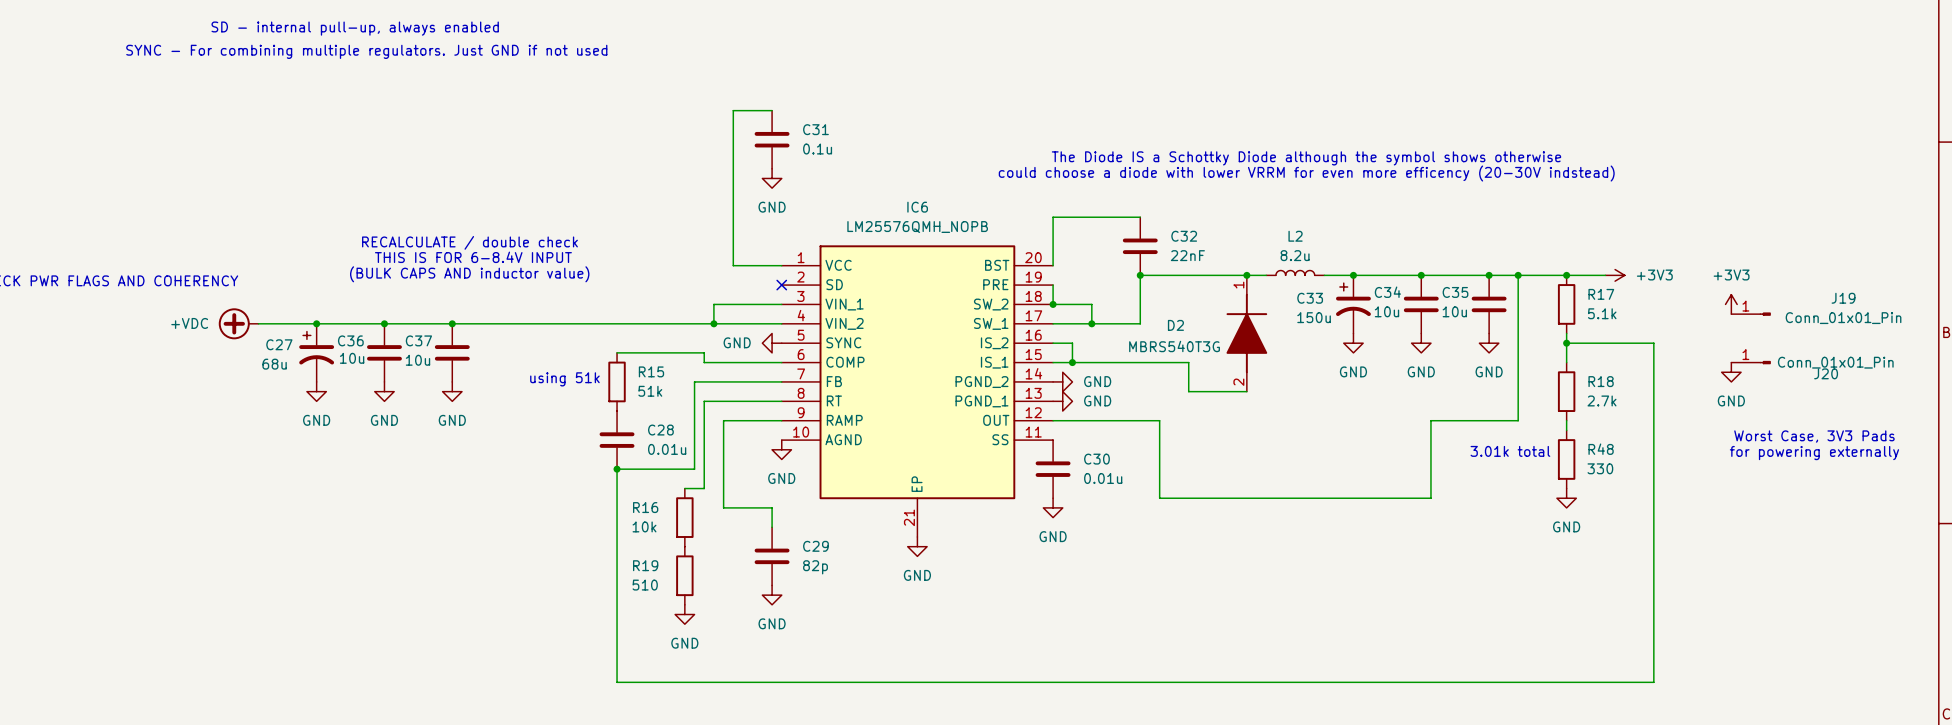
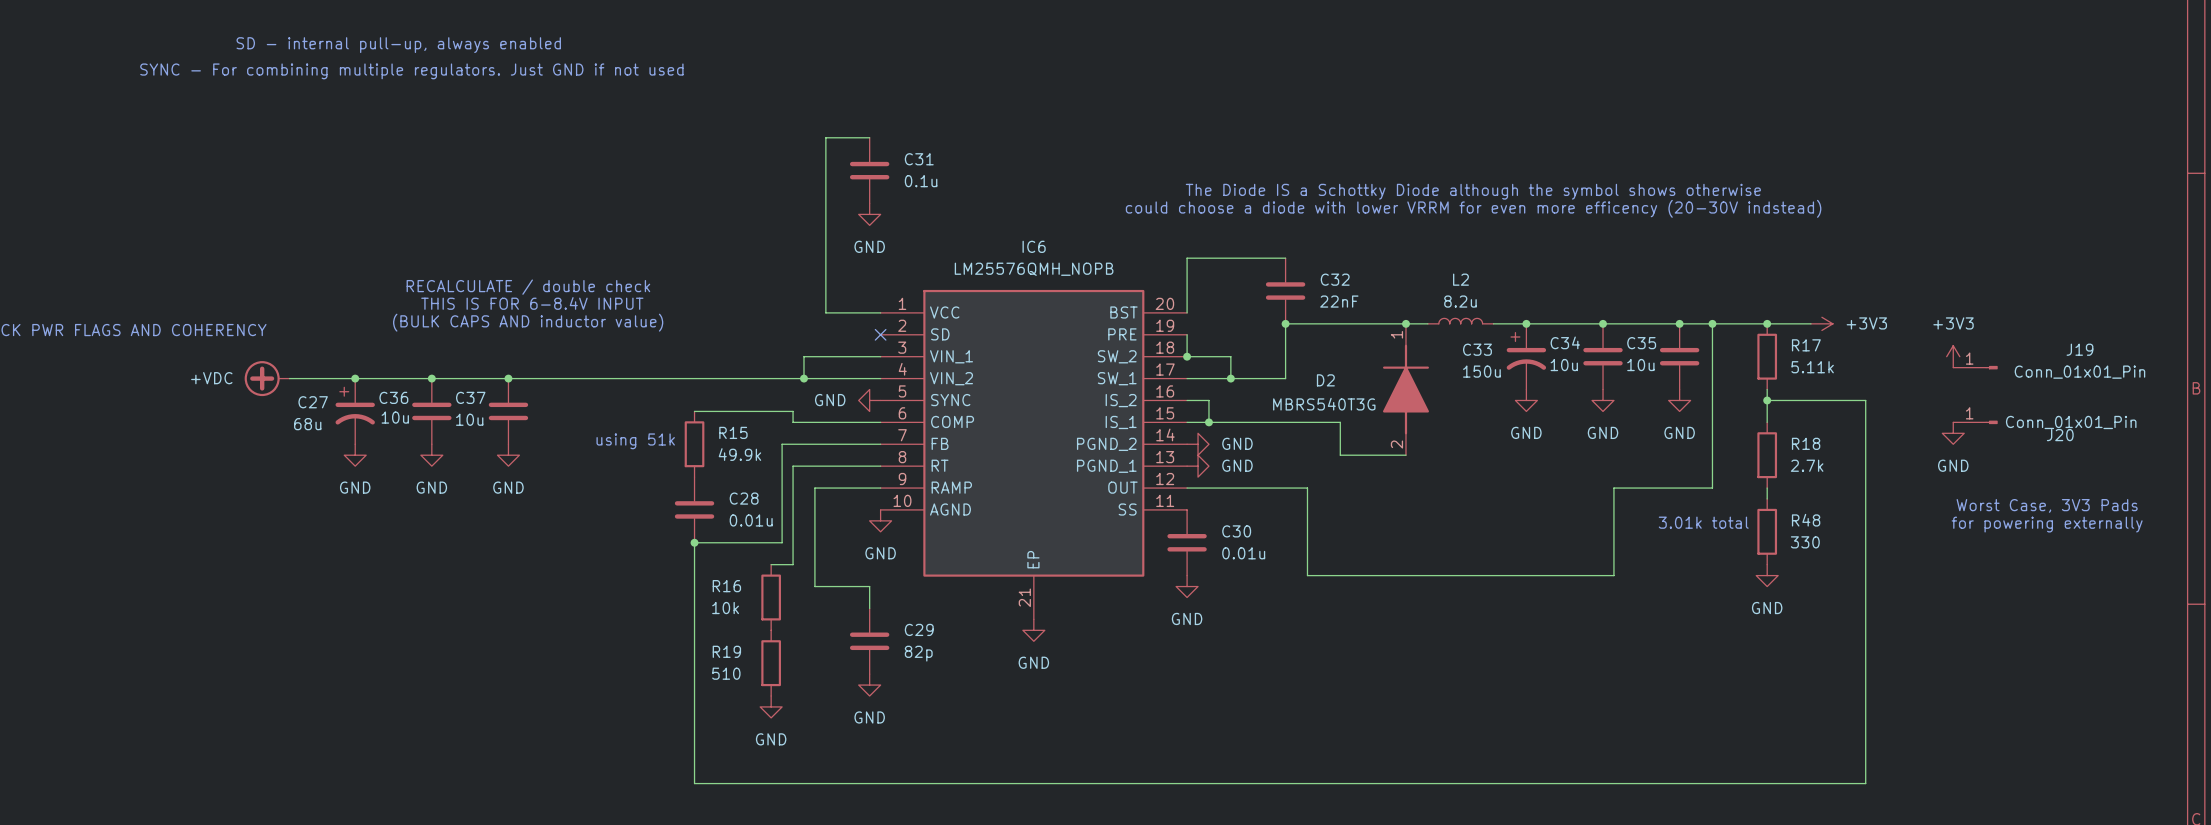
R17 value: 5.1k (1602, 313) -> 5.11k (1812, 367)
R15 value: 51k (650, 391) -> 49.9k (739, 454)

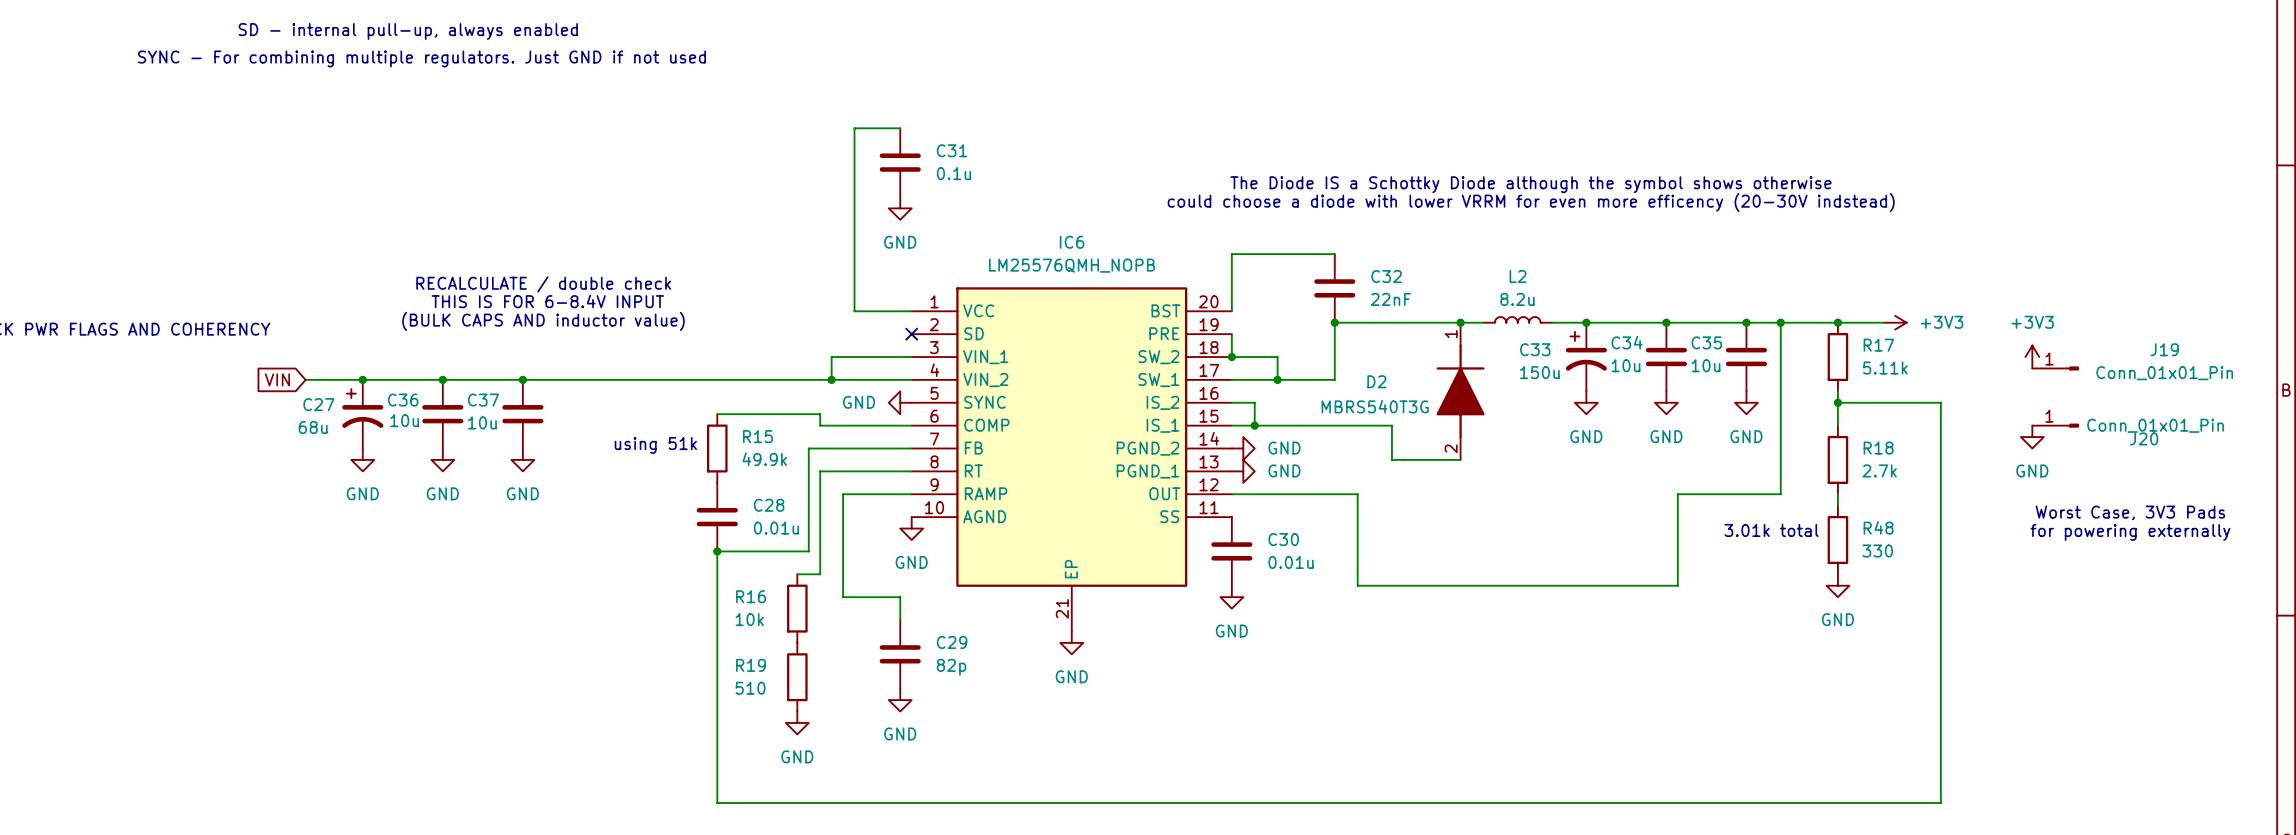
power symbol: +VDC (267, 378) -> none
global label: none -> VIN (277, 379)
wire: (289, 378) (300, 378) -> none

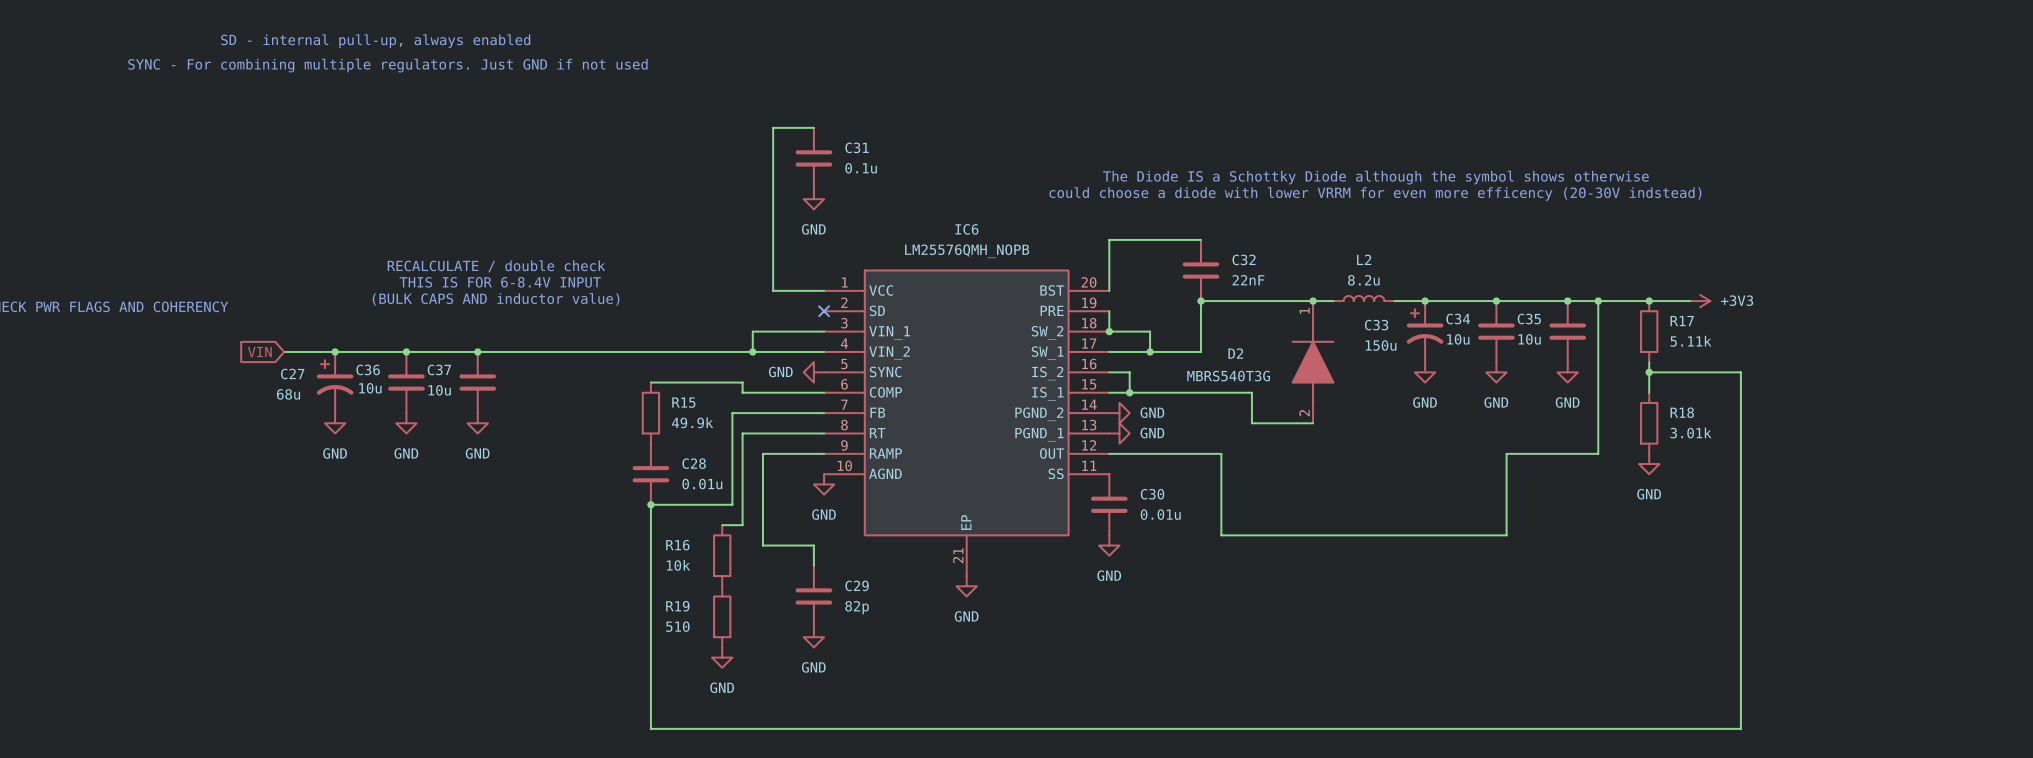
power symbol: +3V3 (2032, 357) -> none
J19: Conn_01x01_Pin (2055, 368) -> none
J20: Conn_01x01_Pin (2055, 425) -> none
power symbol: GND (2032, 437) -> none
text: using 51k (655, 445) -> none
R18 value: 2.7k (1879, 470) -> 3.01k (1690, 432)
text: Worst Case, 3V3 Pads (2130, 512) -> none
text: 3.01k total (1771, 530) -> none
text: for powering externally (2130, 532) -> none
R48: 330 (1837, 539) -> none
power symbol position: GND (1837, 585) -> GND (1649, 464)

